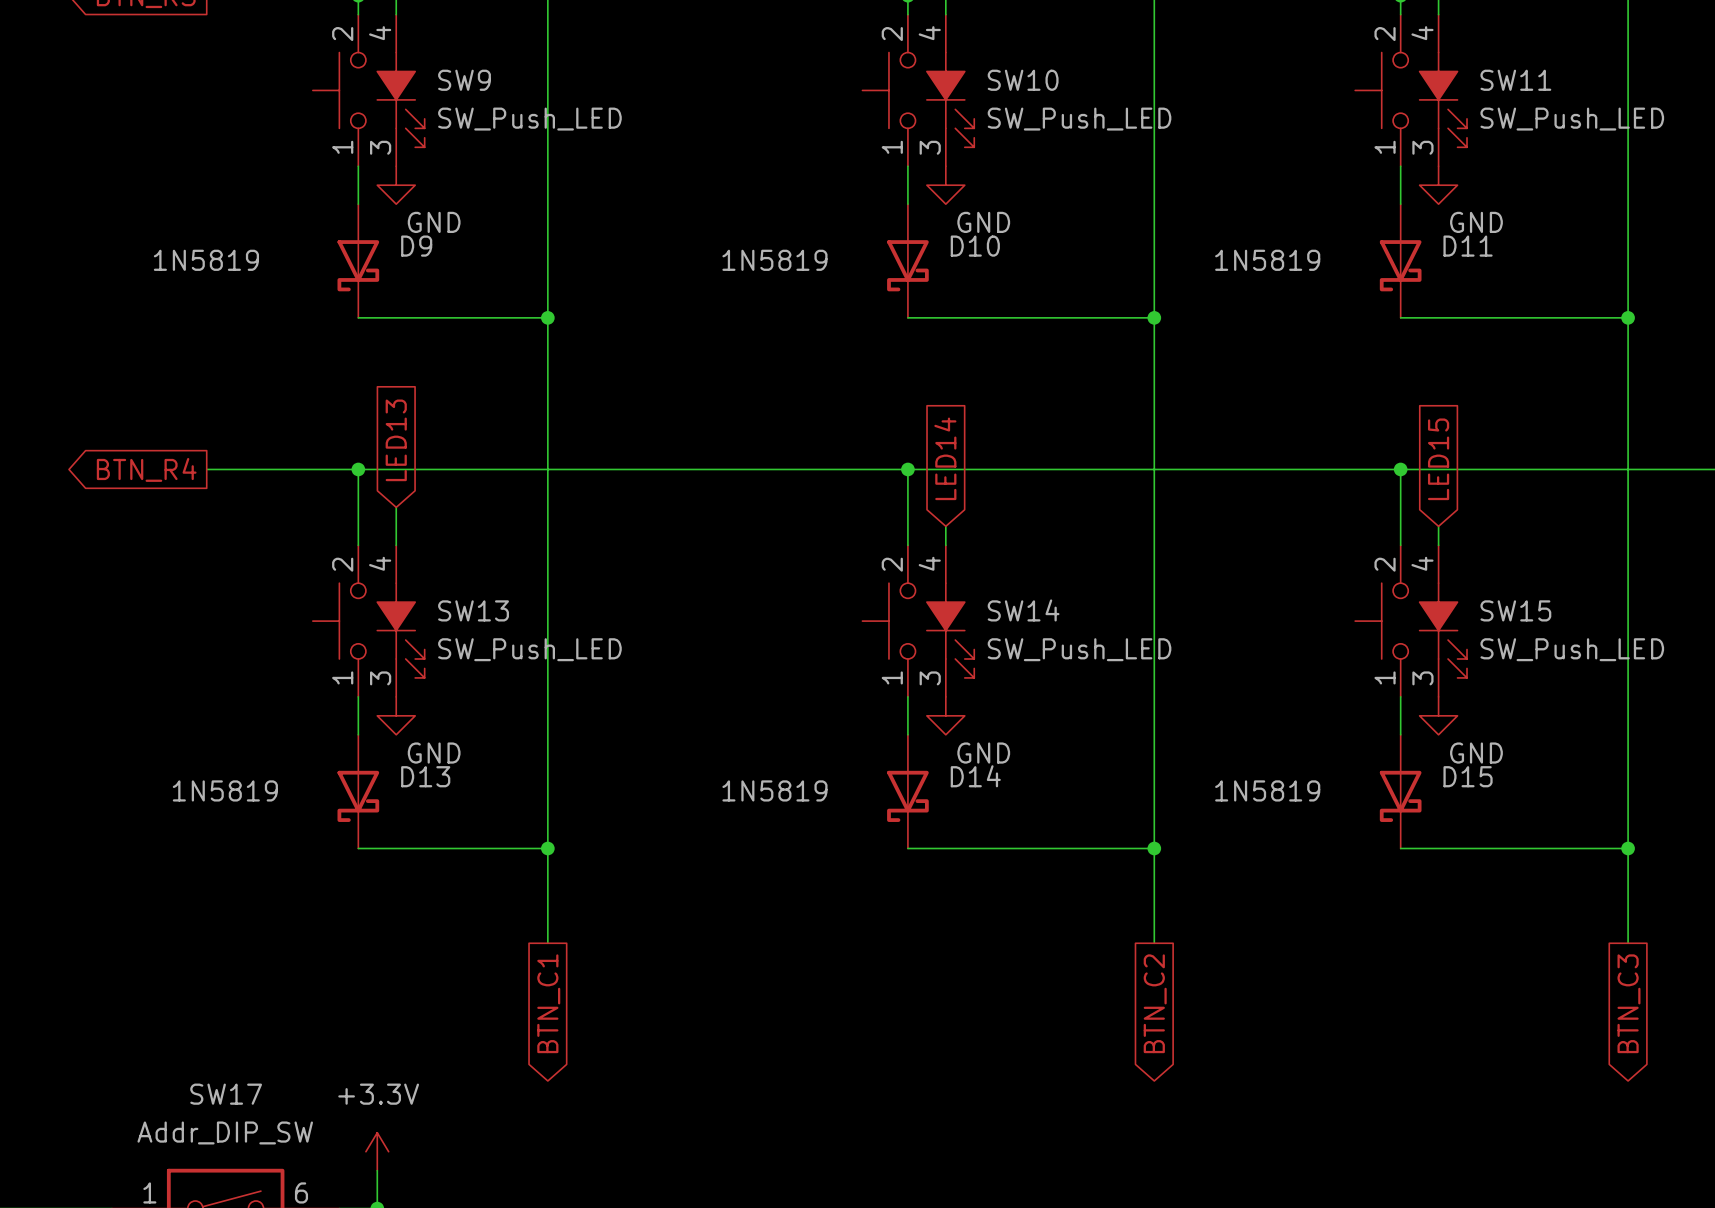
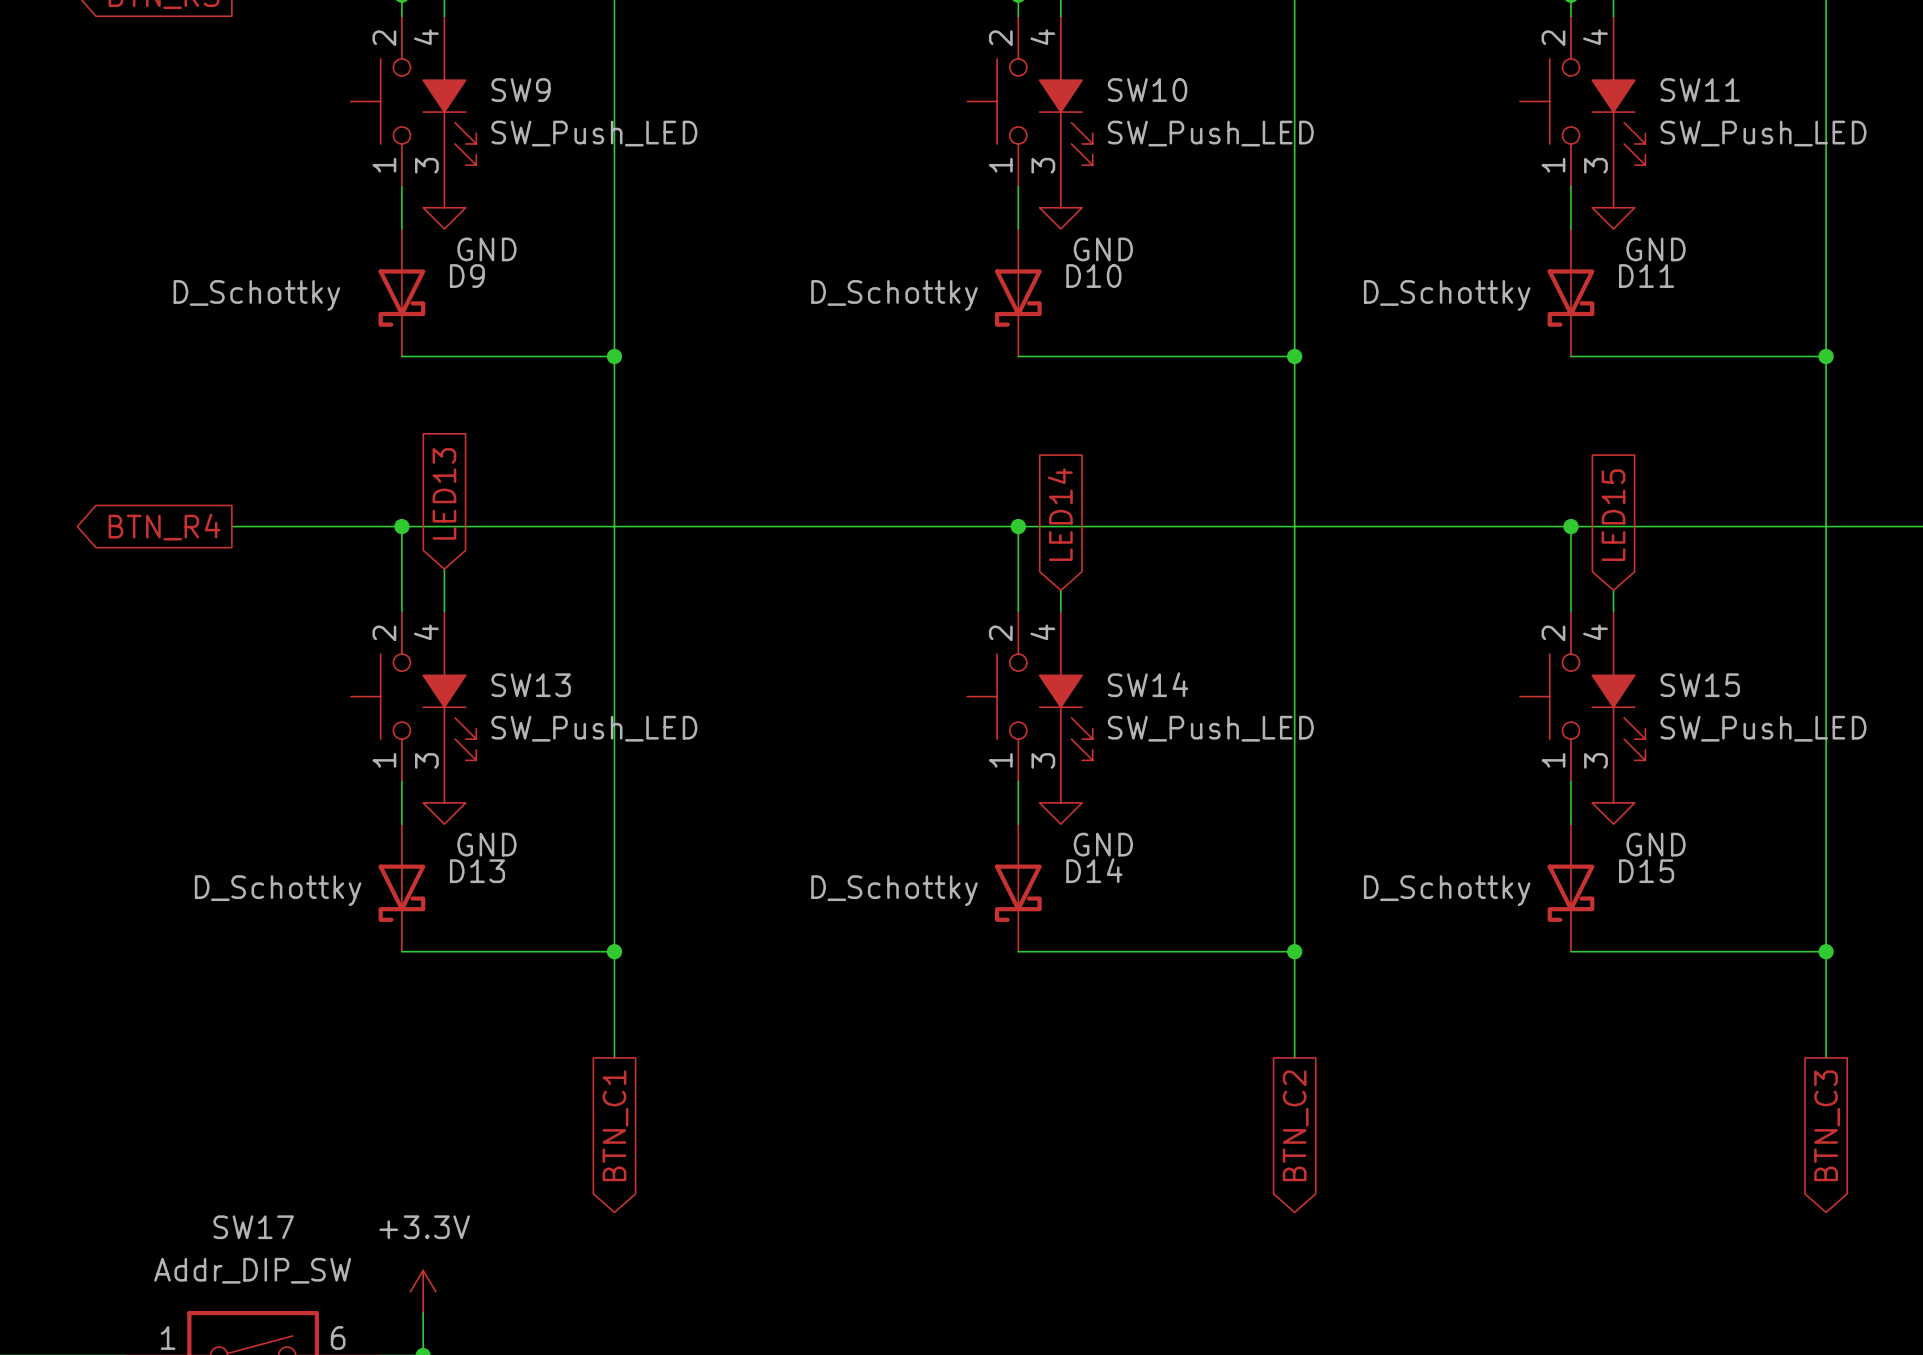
D9 value: 1N5819 (206, 260) -> D_Schottky (256, 295)
D10 value: 1N5819 (774, 260) -> D_Schottky (894, 295)
D11 value: 1N5819 (1267, 260) -> D_Schottky (1447, 295)
D13 value: 1N5819 (225, 790) -> D_Schottky (278, 890)
D14 value: 1N5819 (774, 790) -> D_Schottky (894, 890)
D15 value: 1N5819 (1267, 790) -> D_Schottky (1447, 890)

